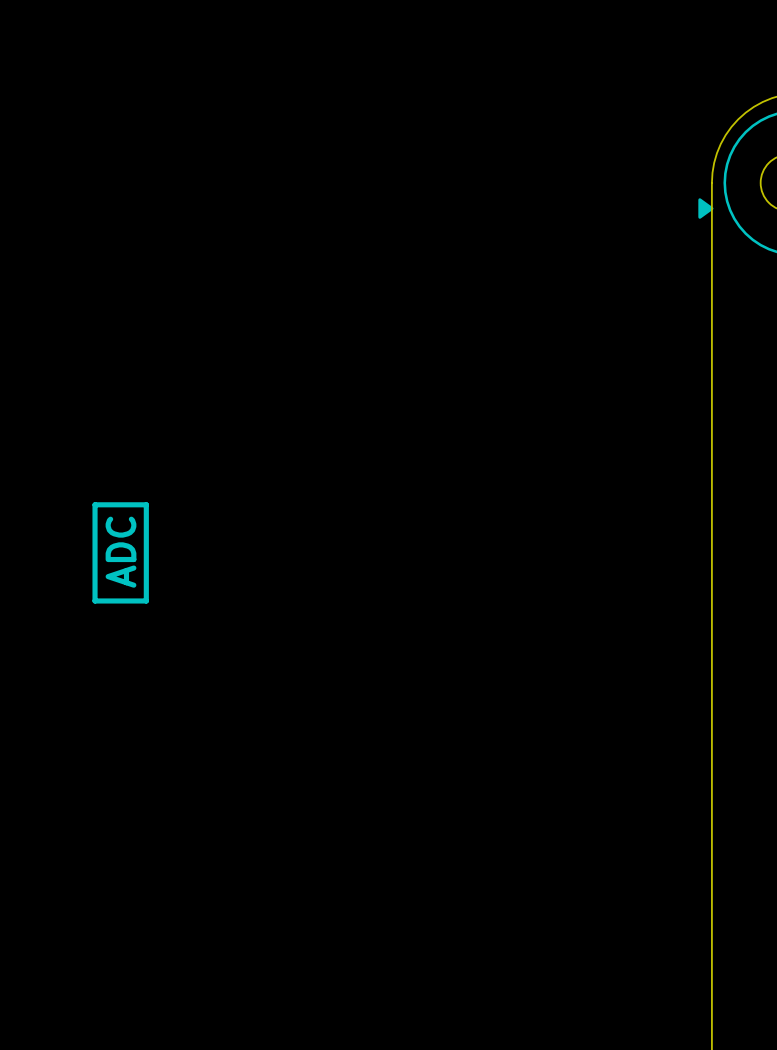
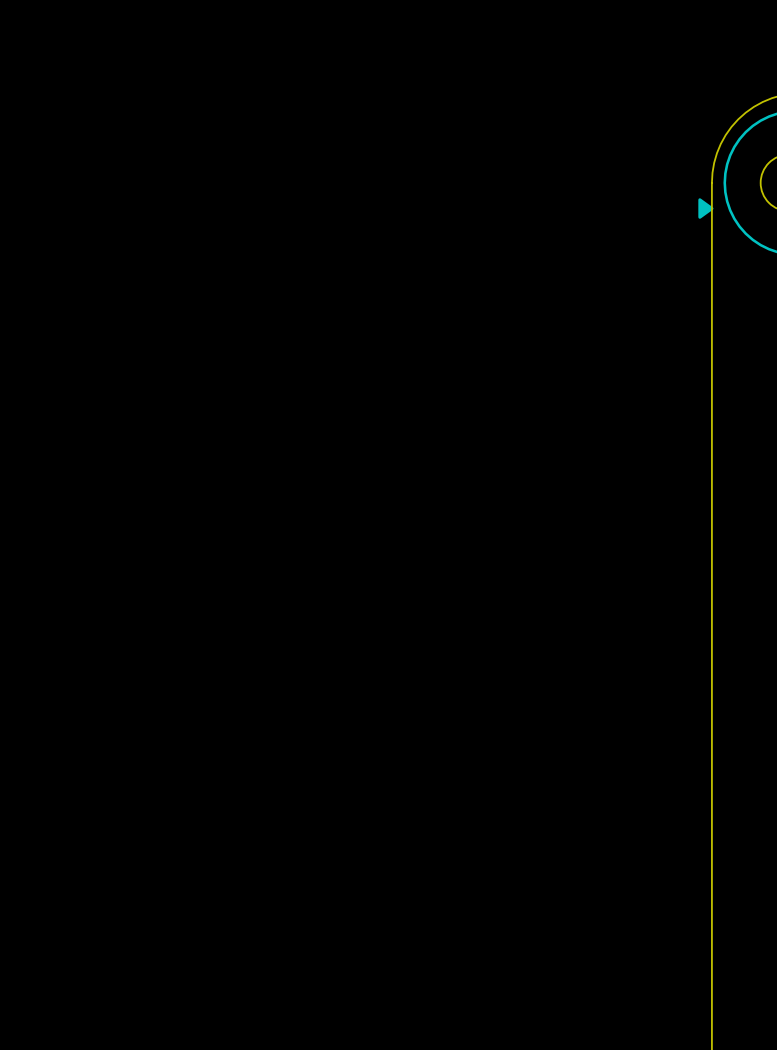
line: (95, 504) (146, 504) (146, 600) (95, 600) (95, 504) -> none
text: ADC (121, 552) -> none

